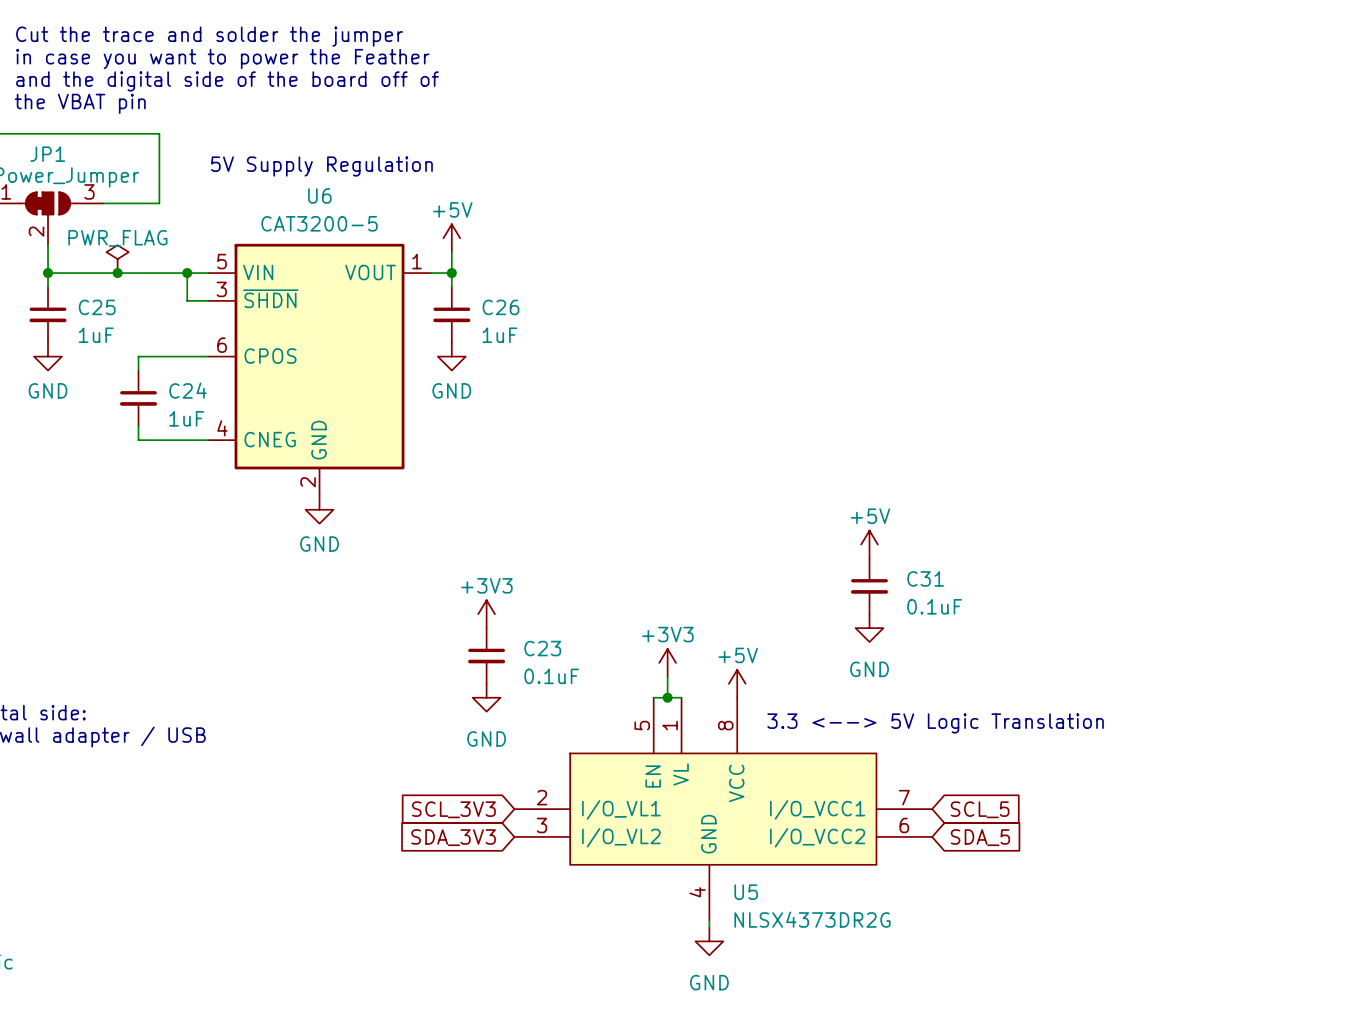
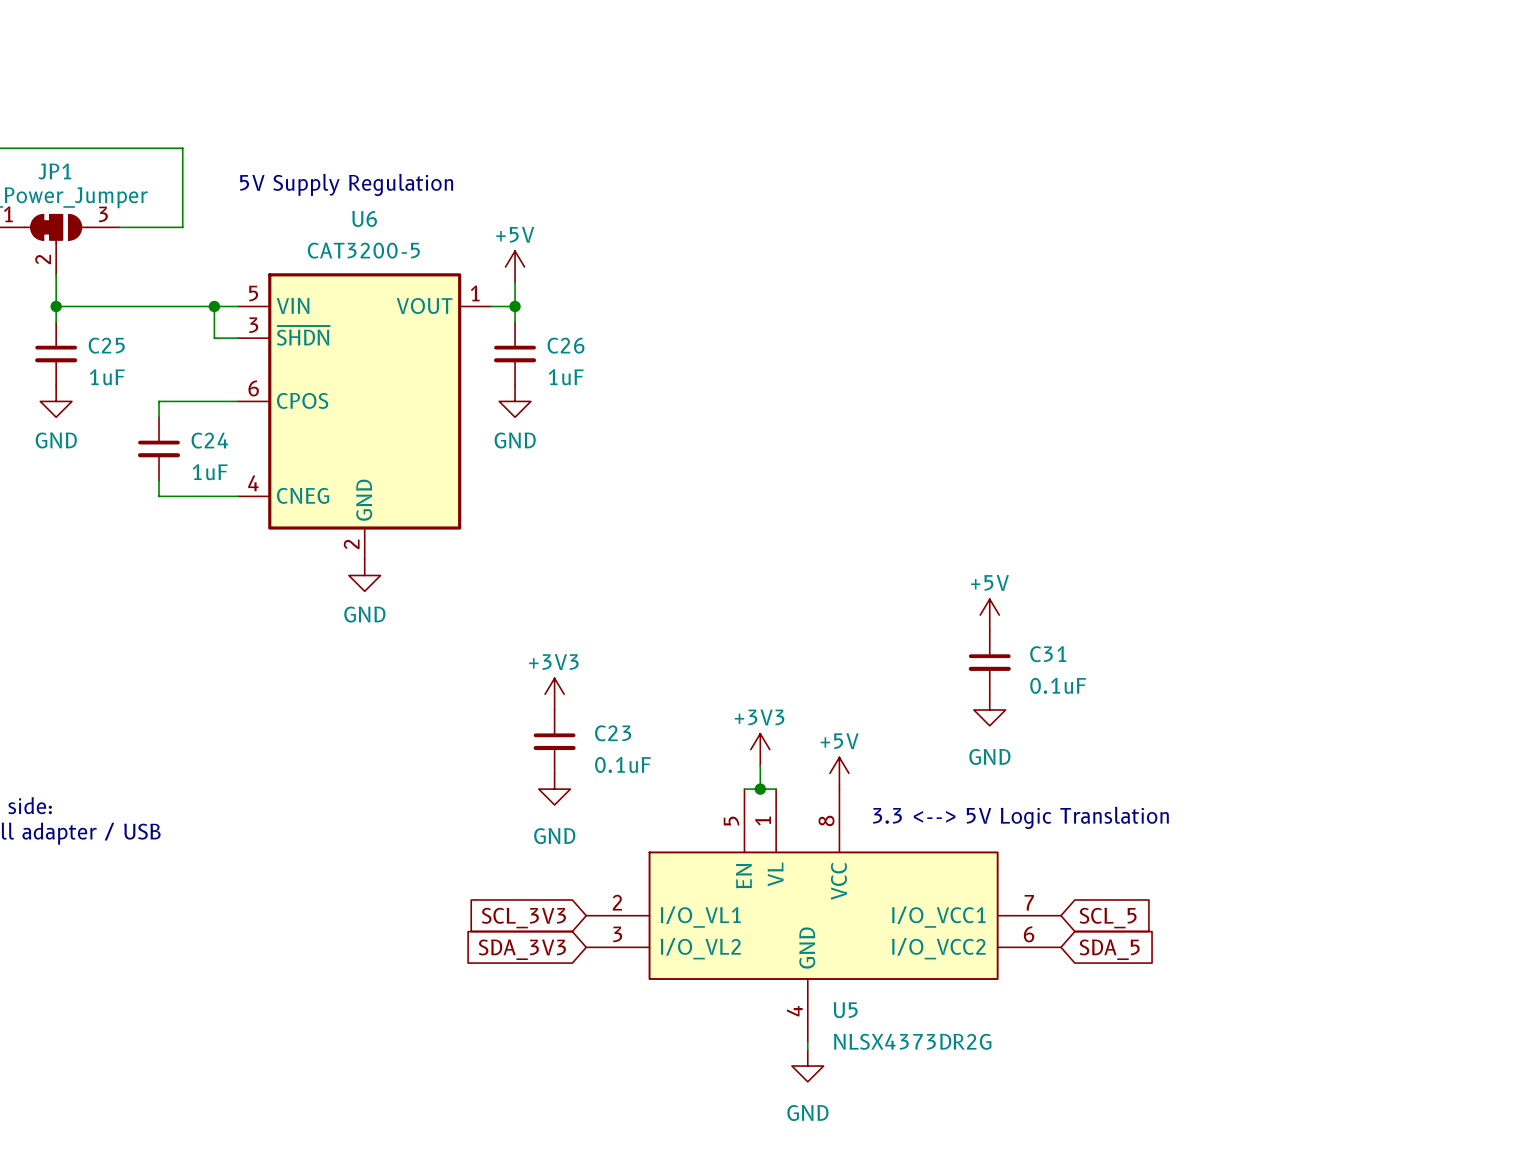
text: Cut the trace and solder the jumper (209, 36) -> none
text: in case you want to power the Feather (222, 59) -> none
text: and the digital side of the board off of (227, 81) -> none
text: the VBAT pin (80, 103) -> none
power symbol: PWR_FLAG (117, 259) -> none
junction: (117, 273) -> none

